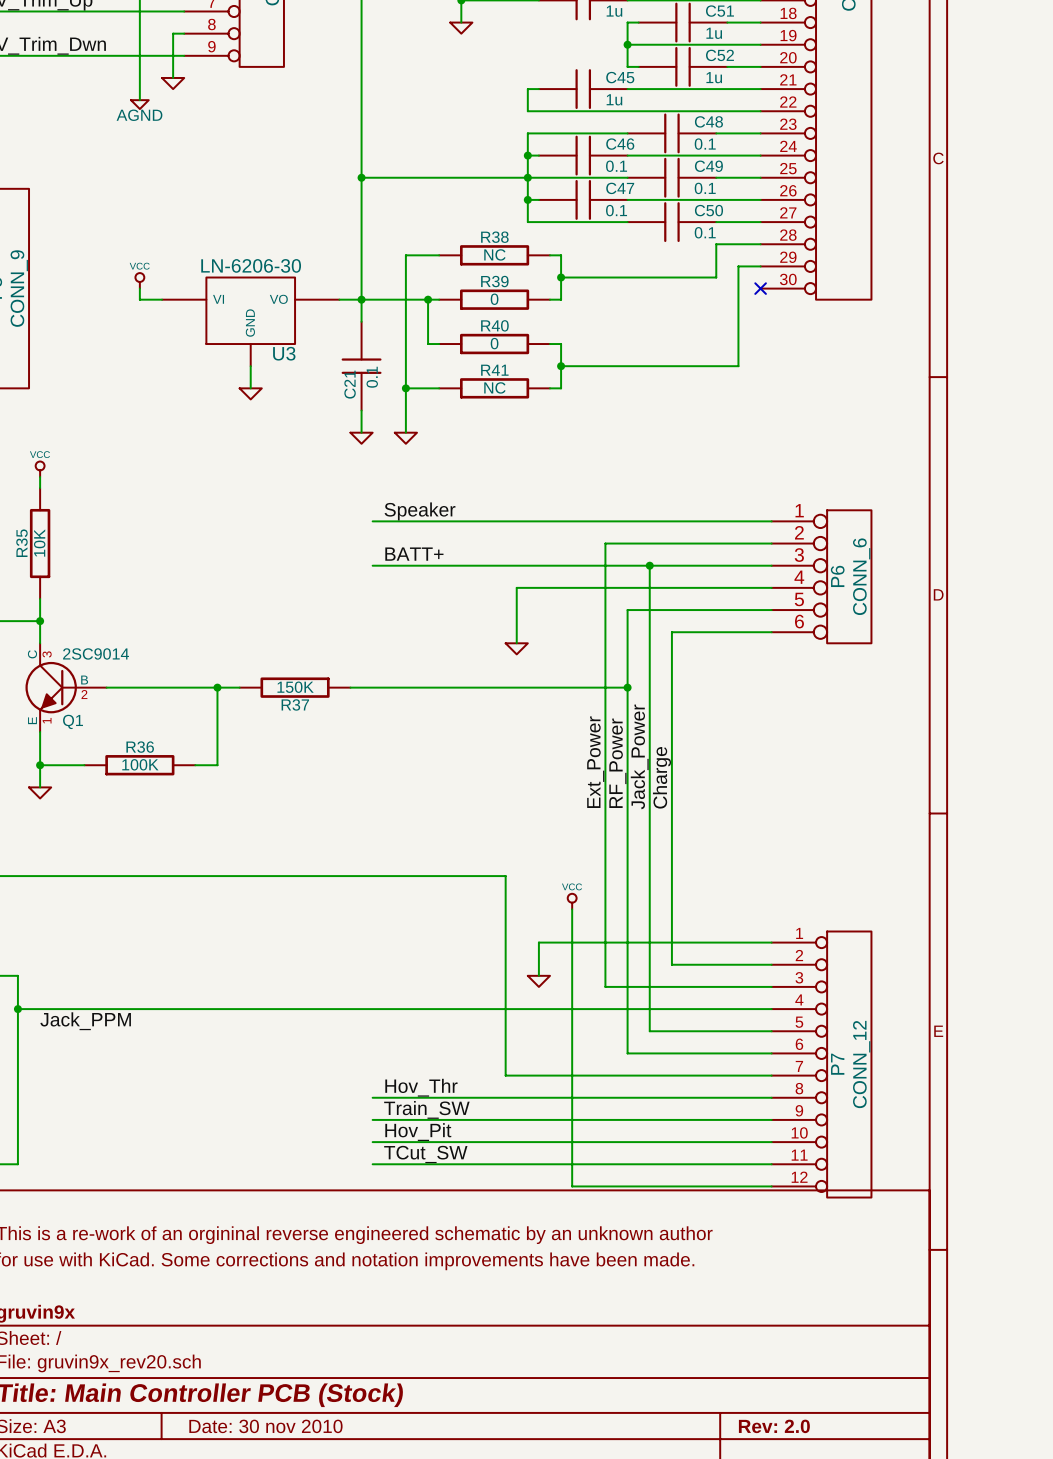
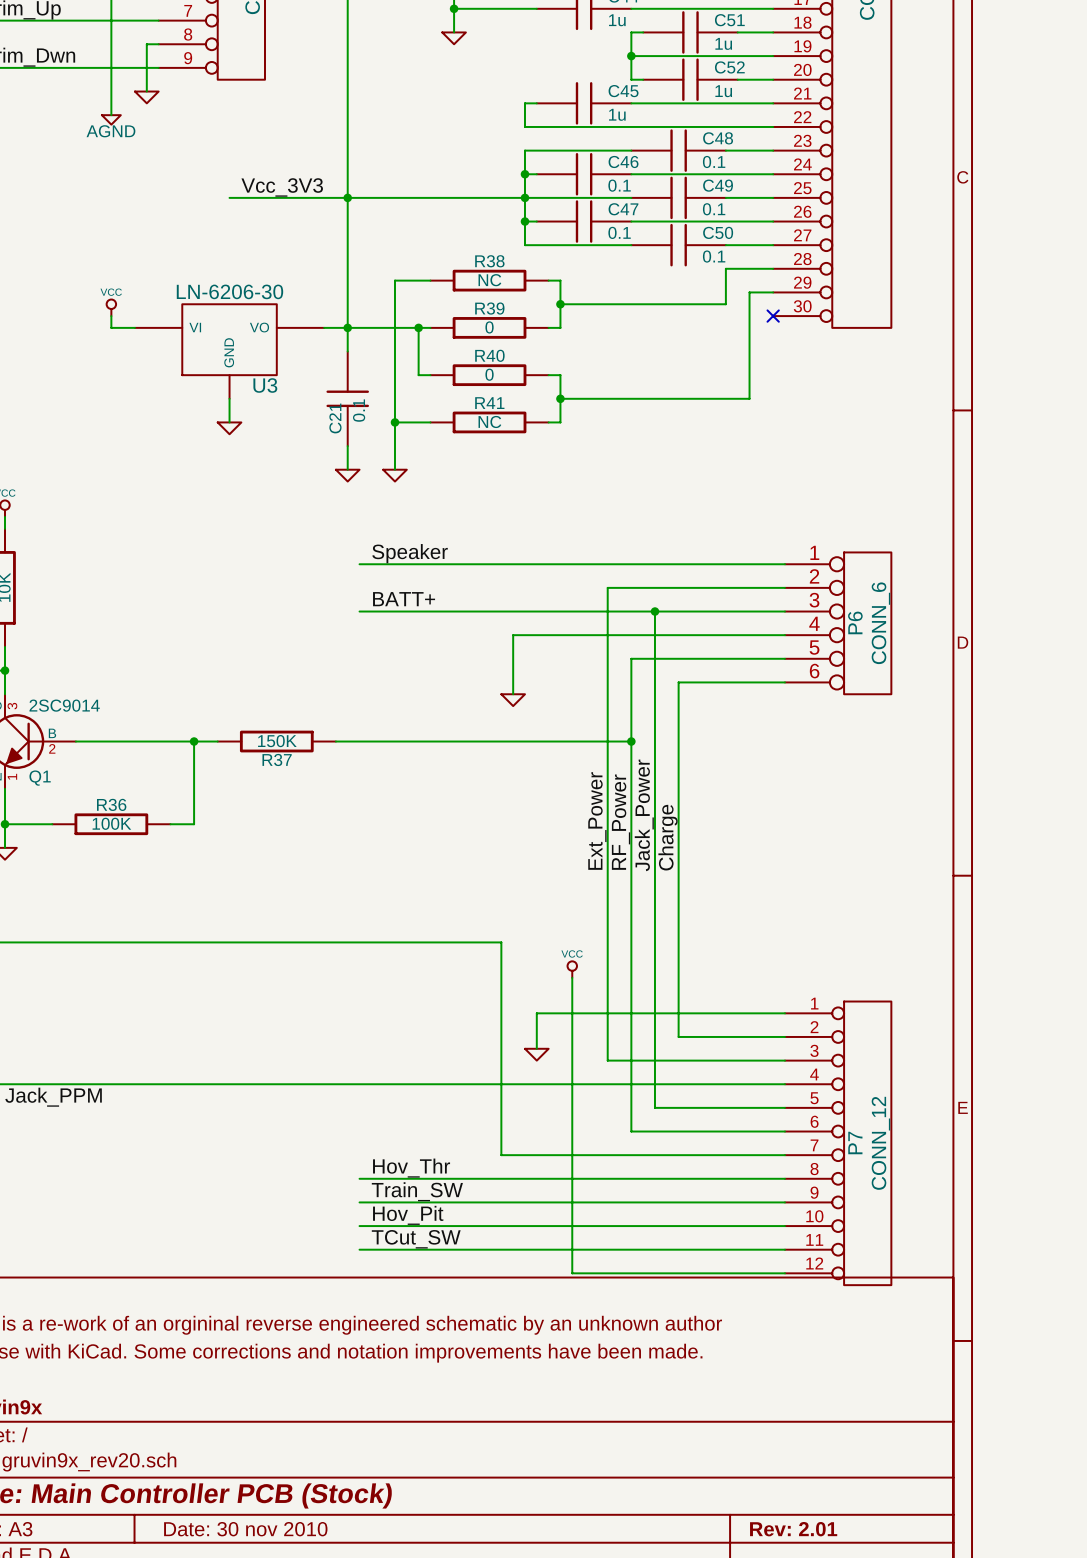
label: none -> Vcc_3V3 (282, 187)
wire: none -> (229, 197) (347, 197)
title block: Rev: 2.0 (774, 1426) -> Rev: 2.01 (793, 1529)

